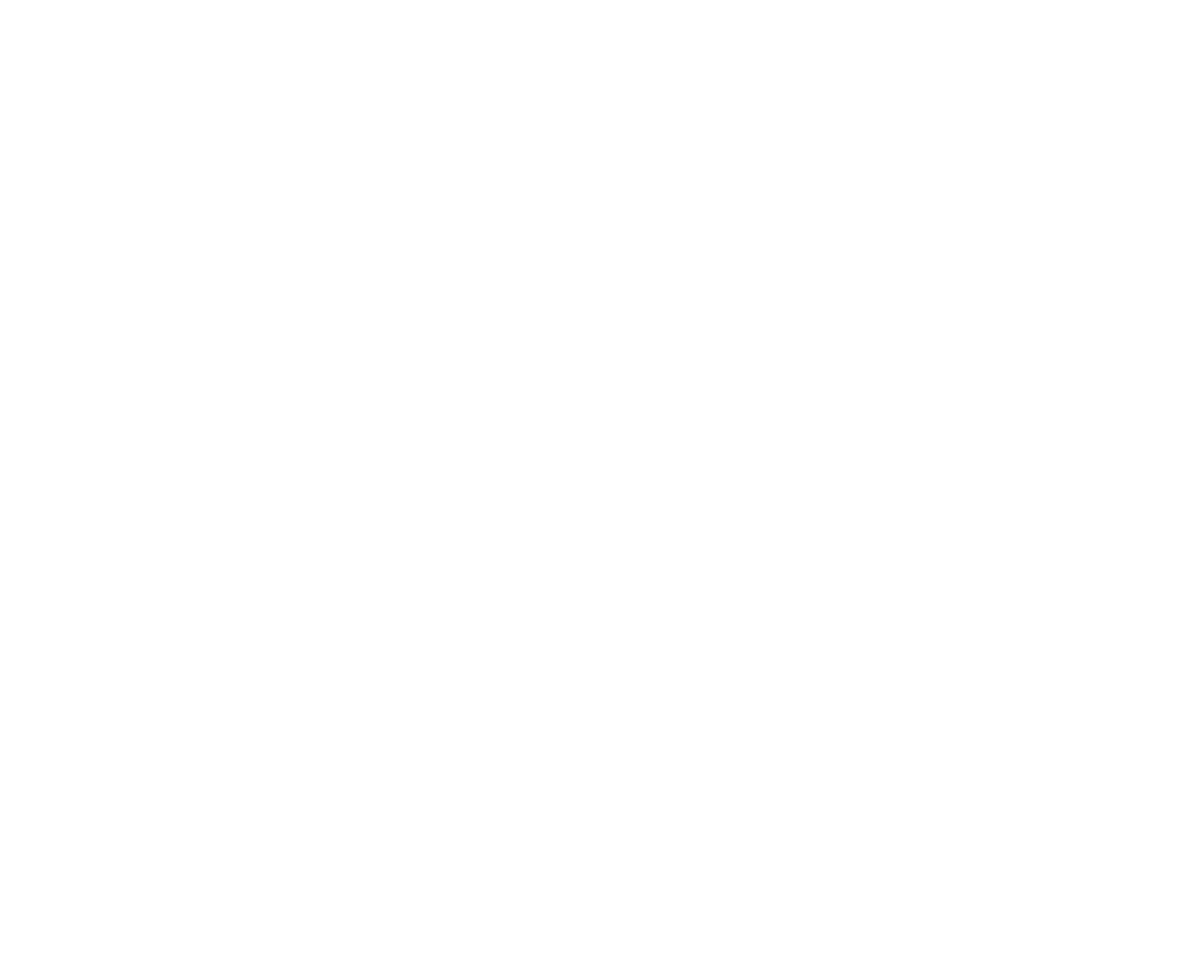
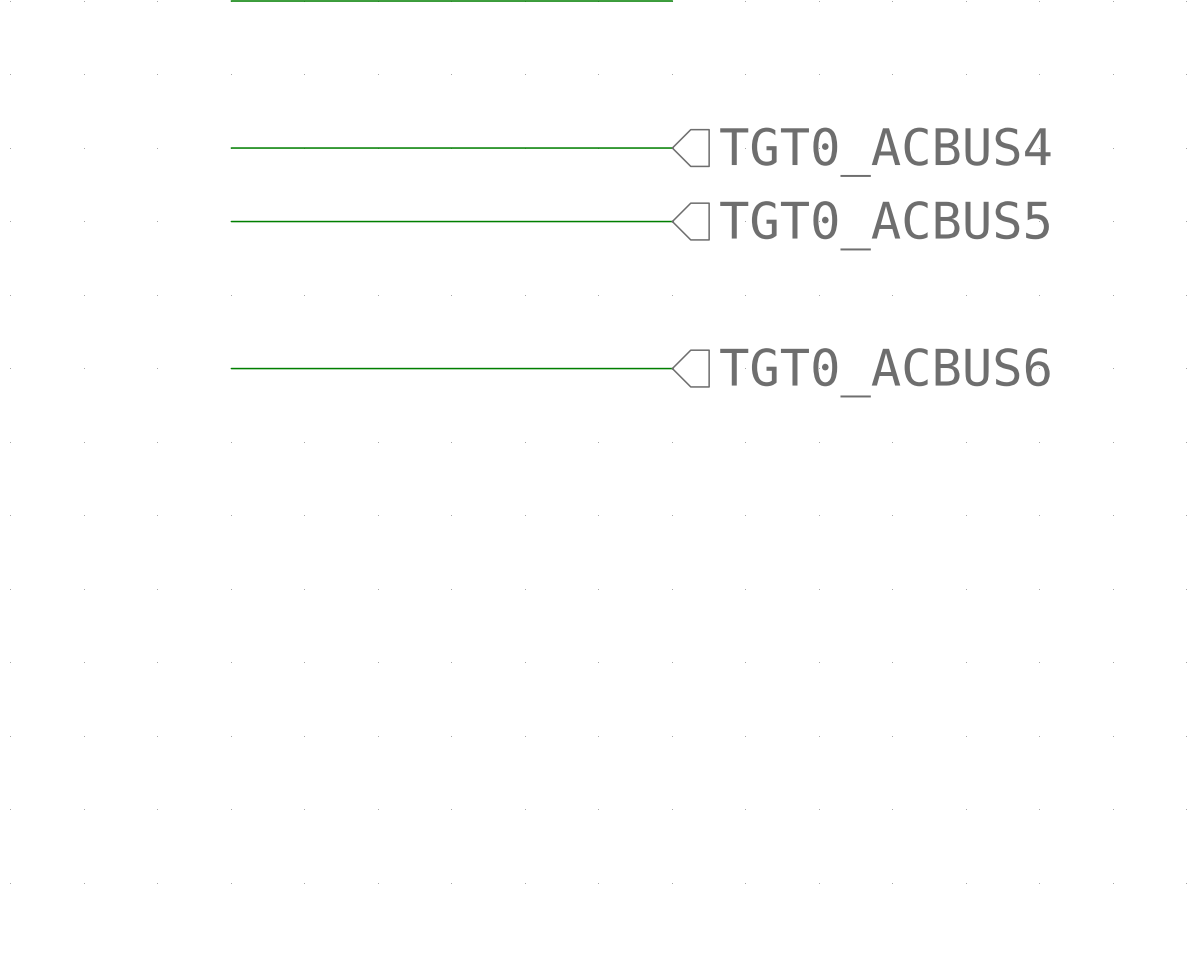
wire: none -> (231, 1) (672, 1)
wire: none -> (231, 148) (672, 148)
hierarchical label: none -> TGT0_ACBUS4 (885, 152)
wire: none -> (231, 221) (672, 221)
hierarchical label: none -> TGT0_ACBUS5 (884, 225)
wire: none -> (231, 368) (672, 368)
hierarchical label: none -> TGT0_ACBUS6 (884, 372)

